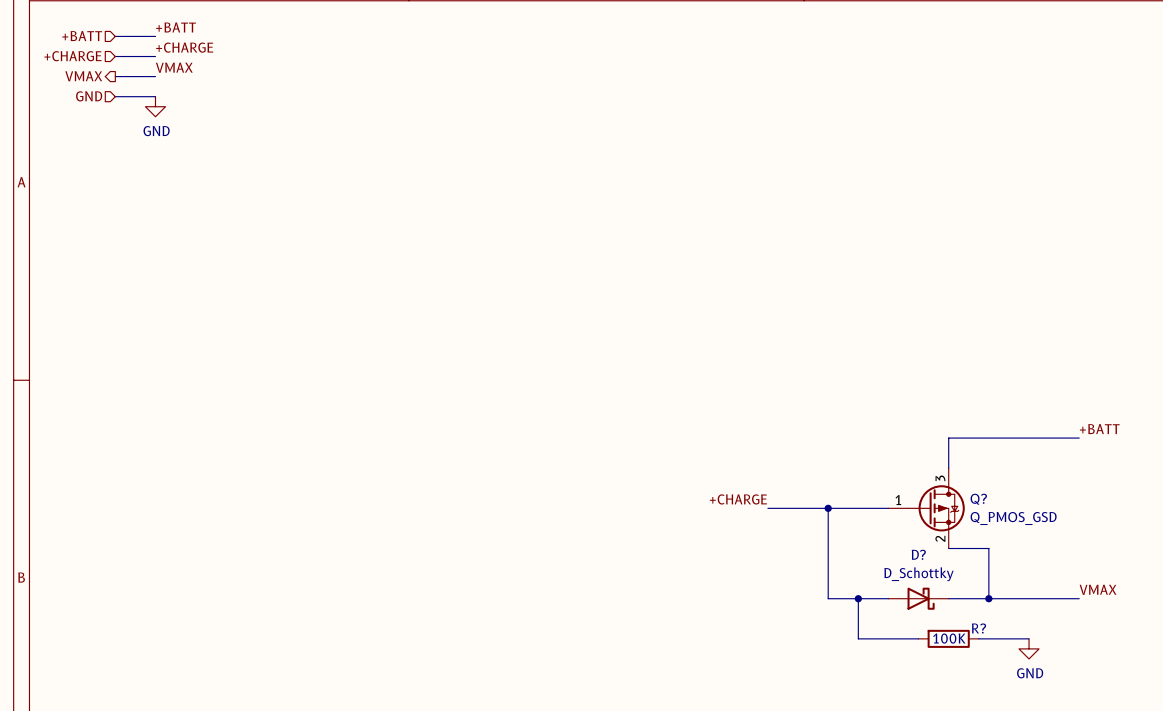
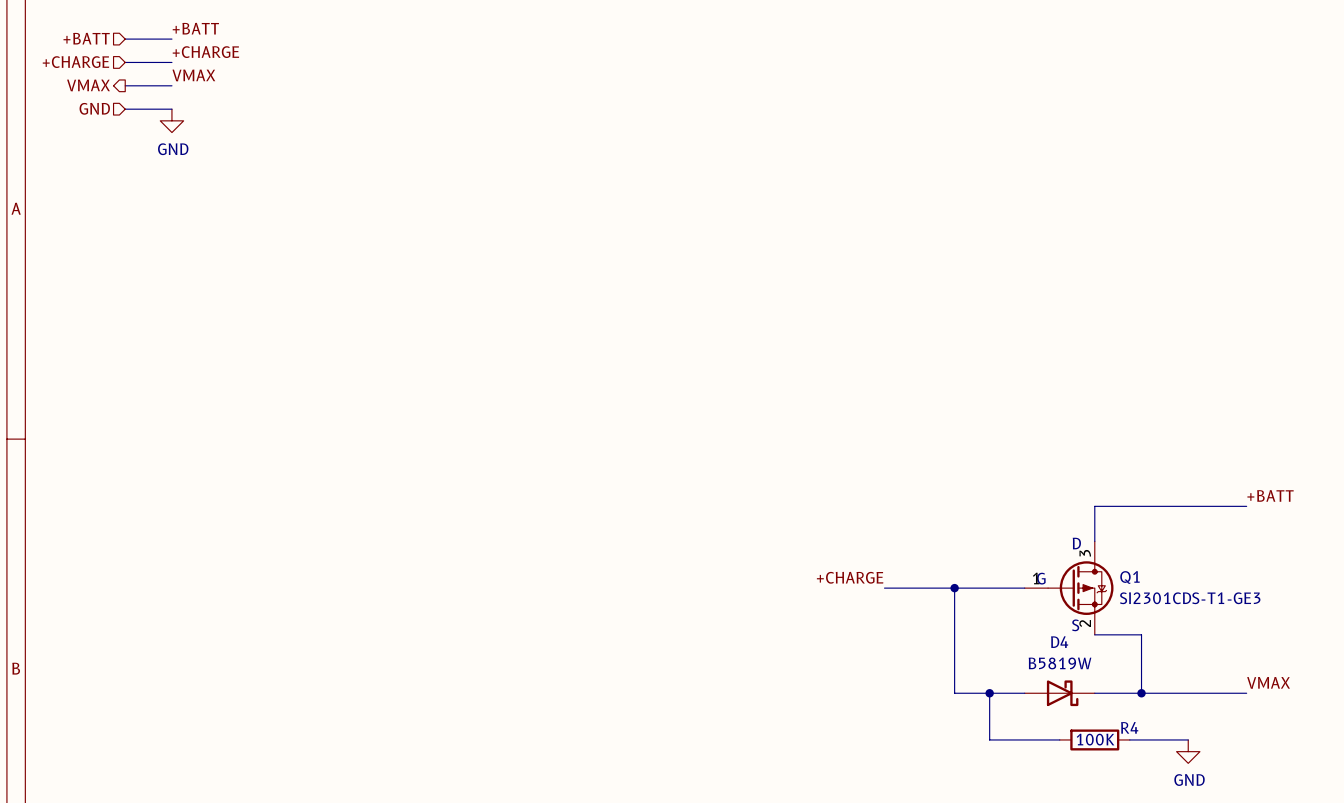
text: none -> D (1076, 543)
Q? name: Q? (978, 499) -> Q1 (1129, 577)
text: none -> G (1041, 578)
Q? value: Q_PMOS_GSD (1013, 518) -> SI2301CDS-T1-GE3 (1190, 598)
text: none -> S (1075, 625)
D? name: D? (918, 554) -> D4 (1059, 642)
D? value: D_Schottky (918, 574) -> B5819W (1060, 663)
R? name: R? (979, 628) -> R4 (1129, 727)

